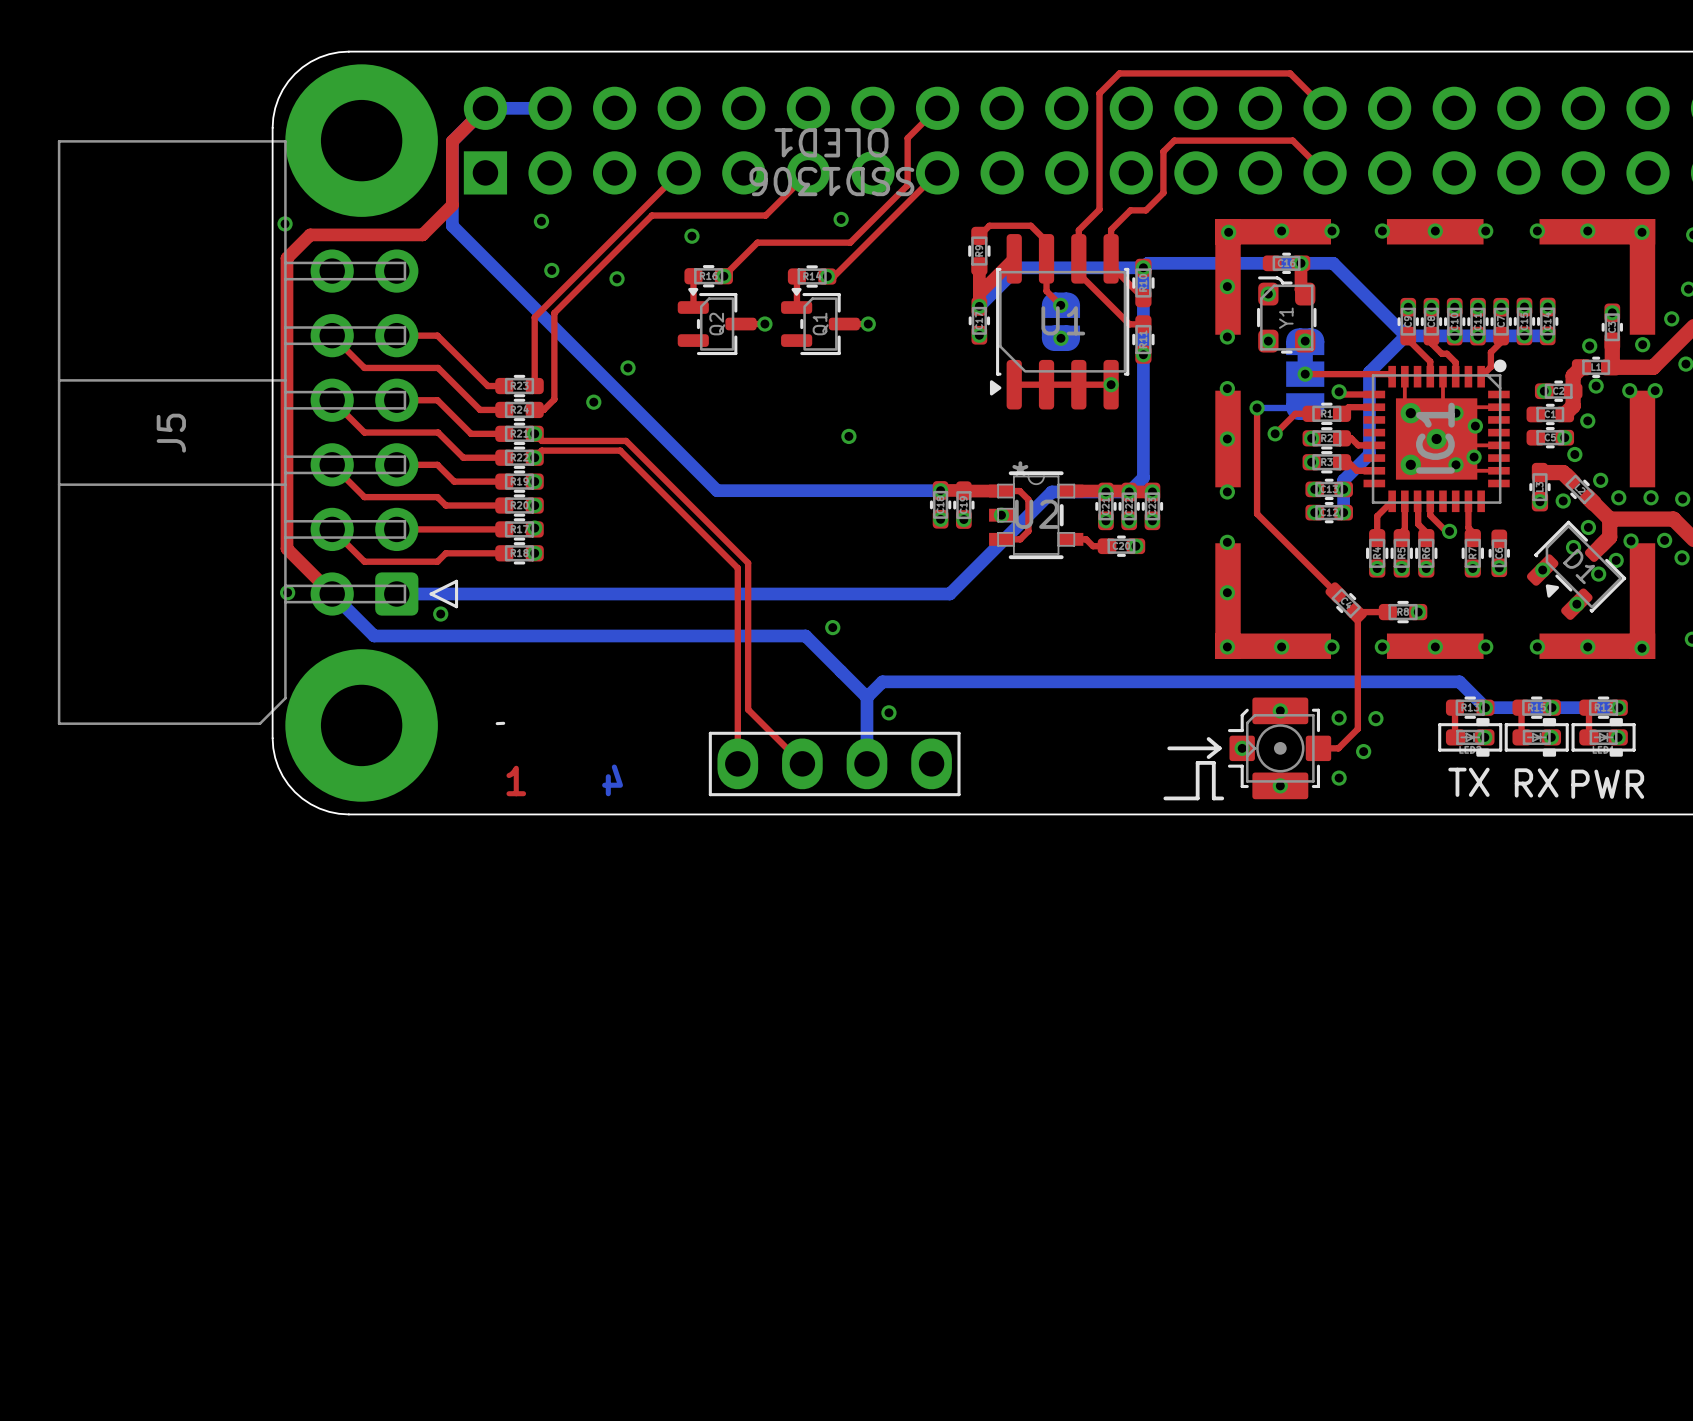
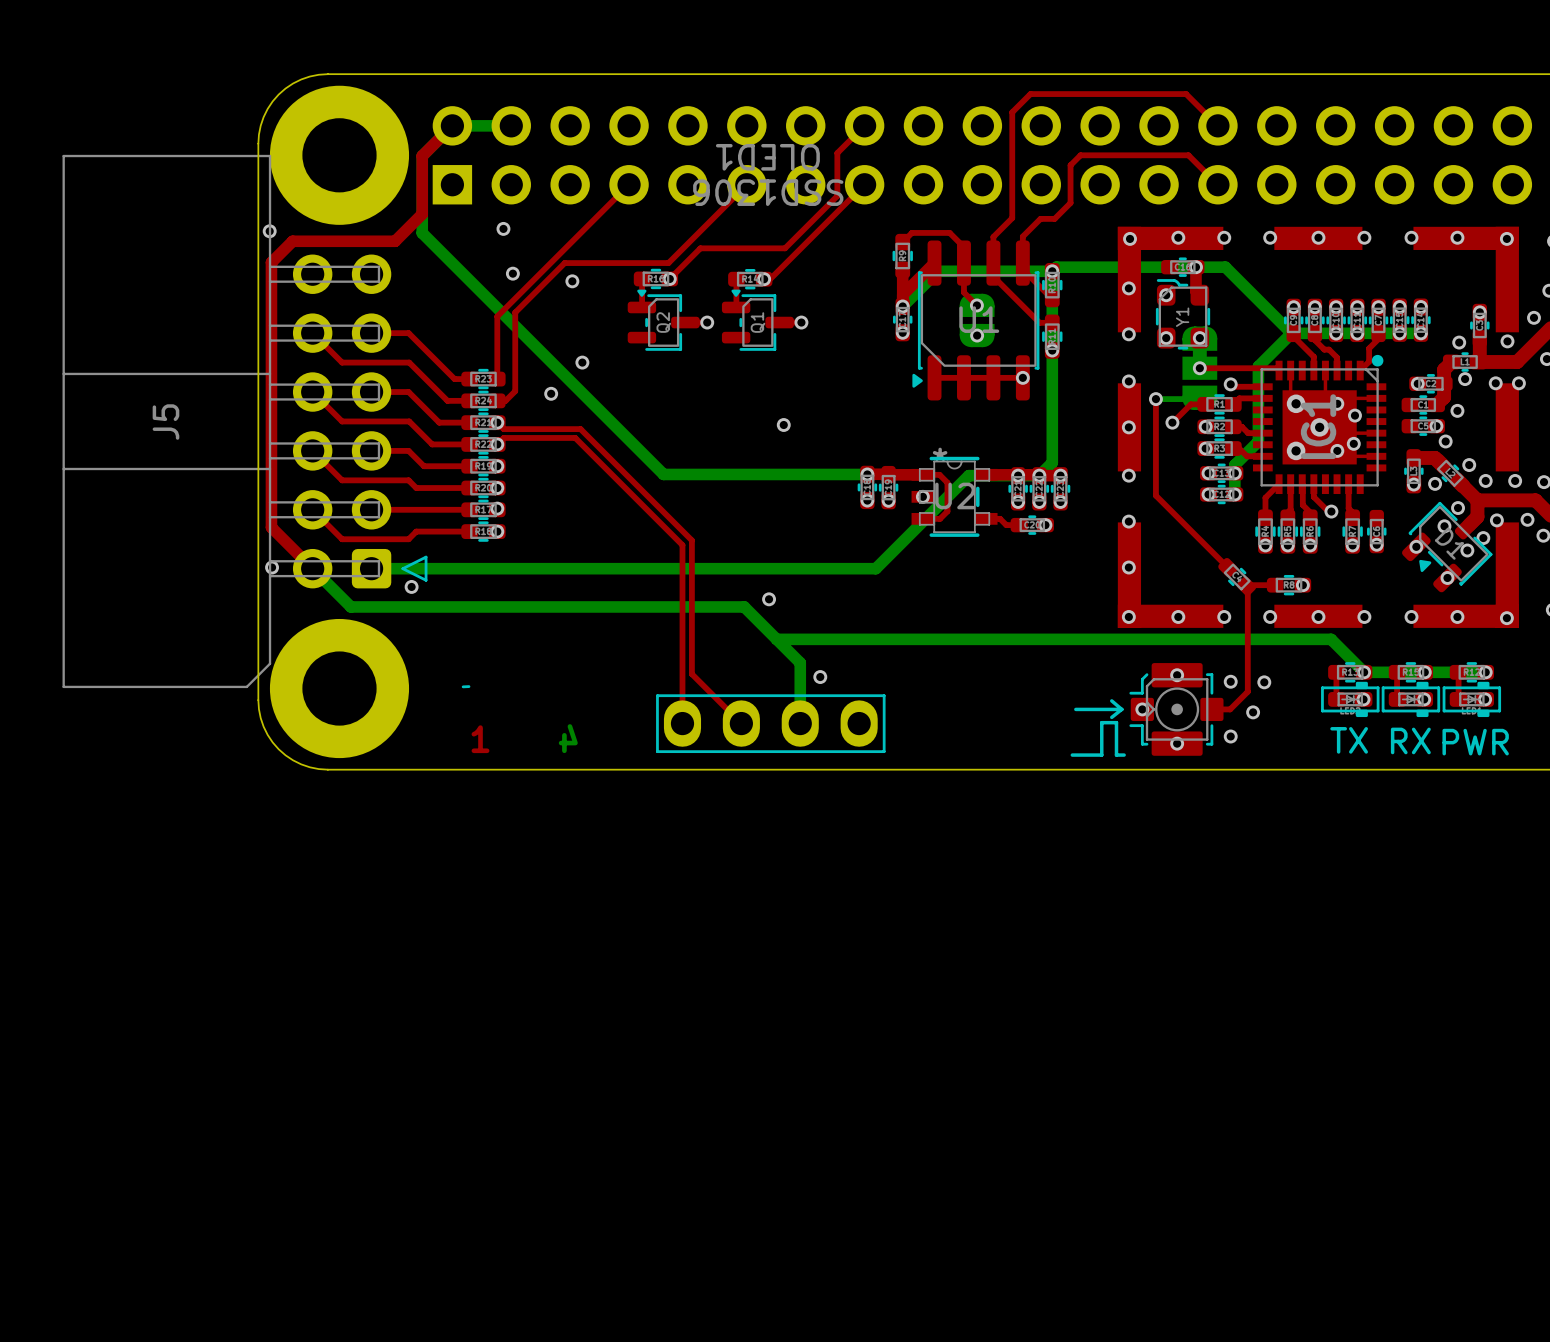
top track: (765, 215) (651, 215) (608, 258) -> (707, 223) (668, 263) (564, 263)
via: (841, 219) -> none
via: (691, 236) -> none
bottom track: (1459, 681) (882, 681) (866, 697) -> (1340, 648) (1331, 639) (776, 639)

